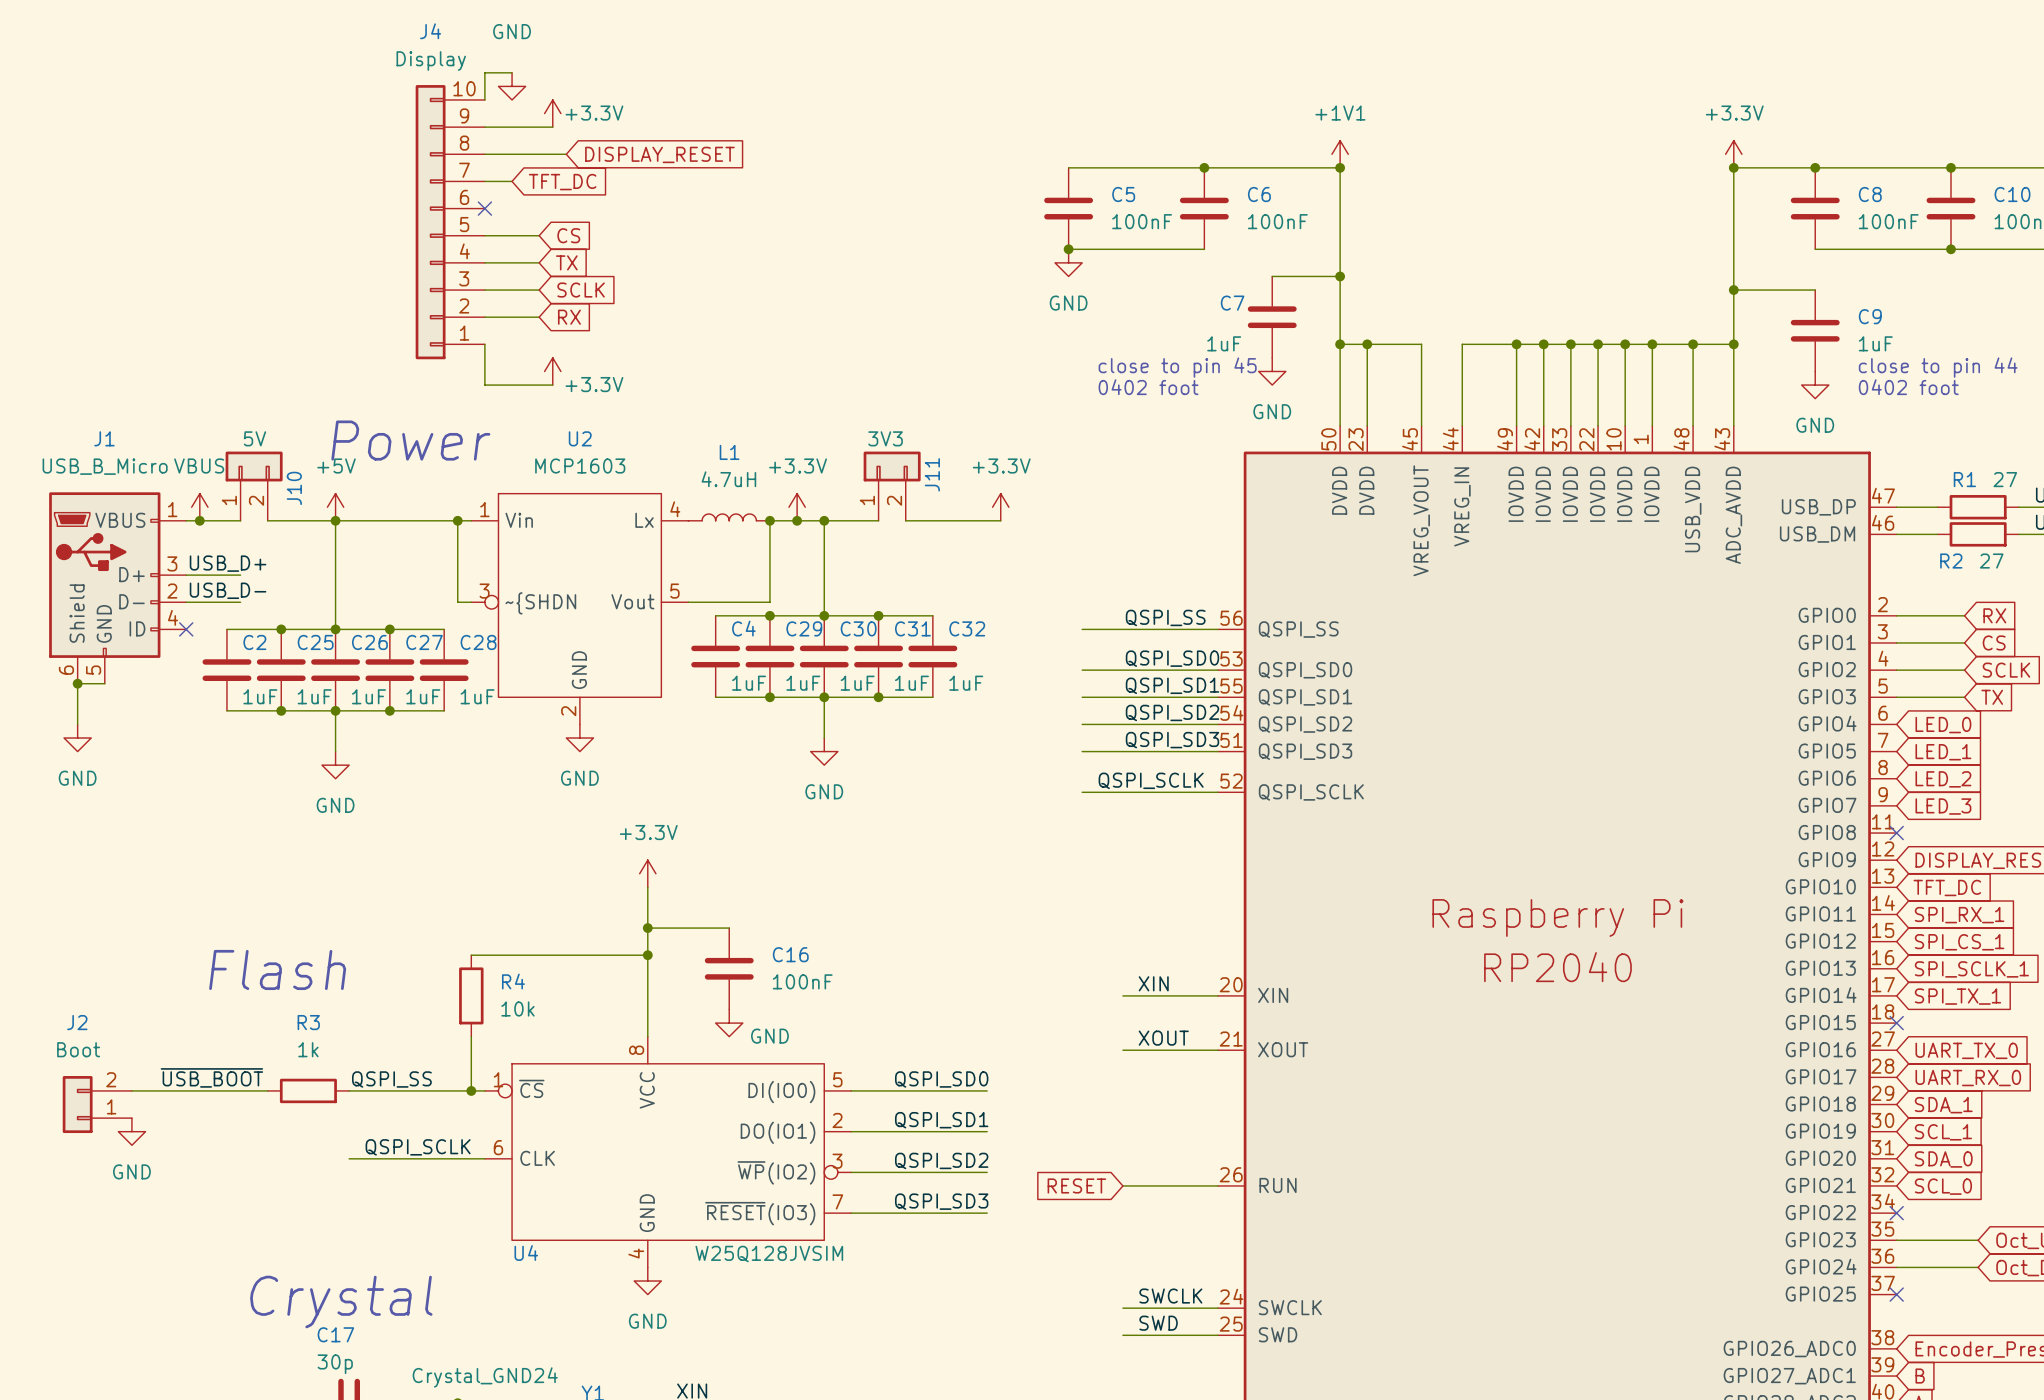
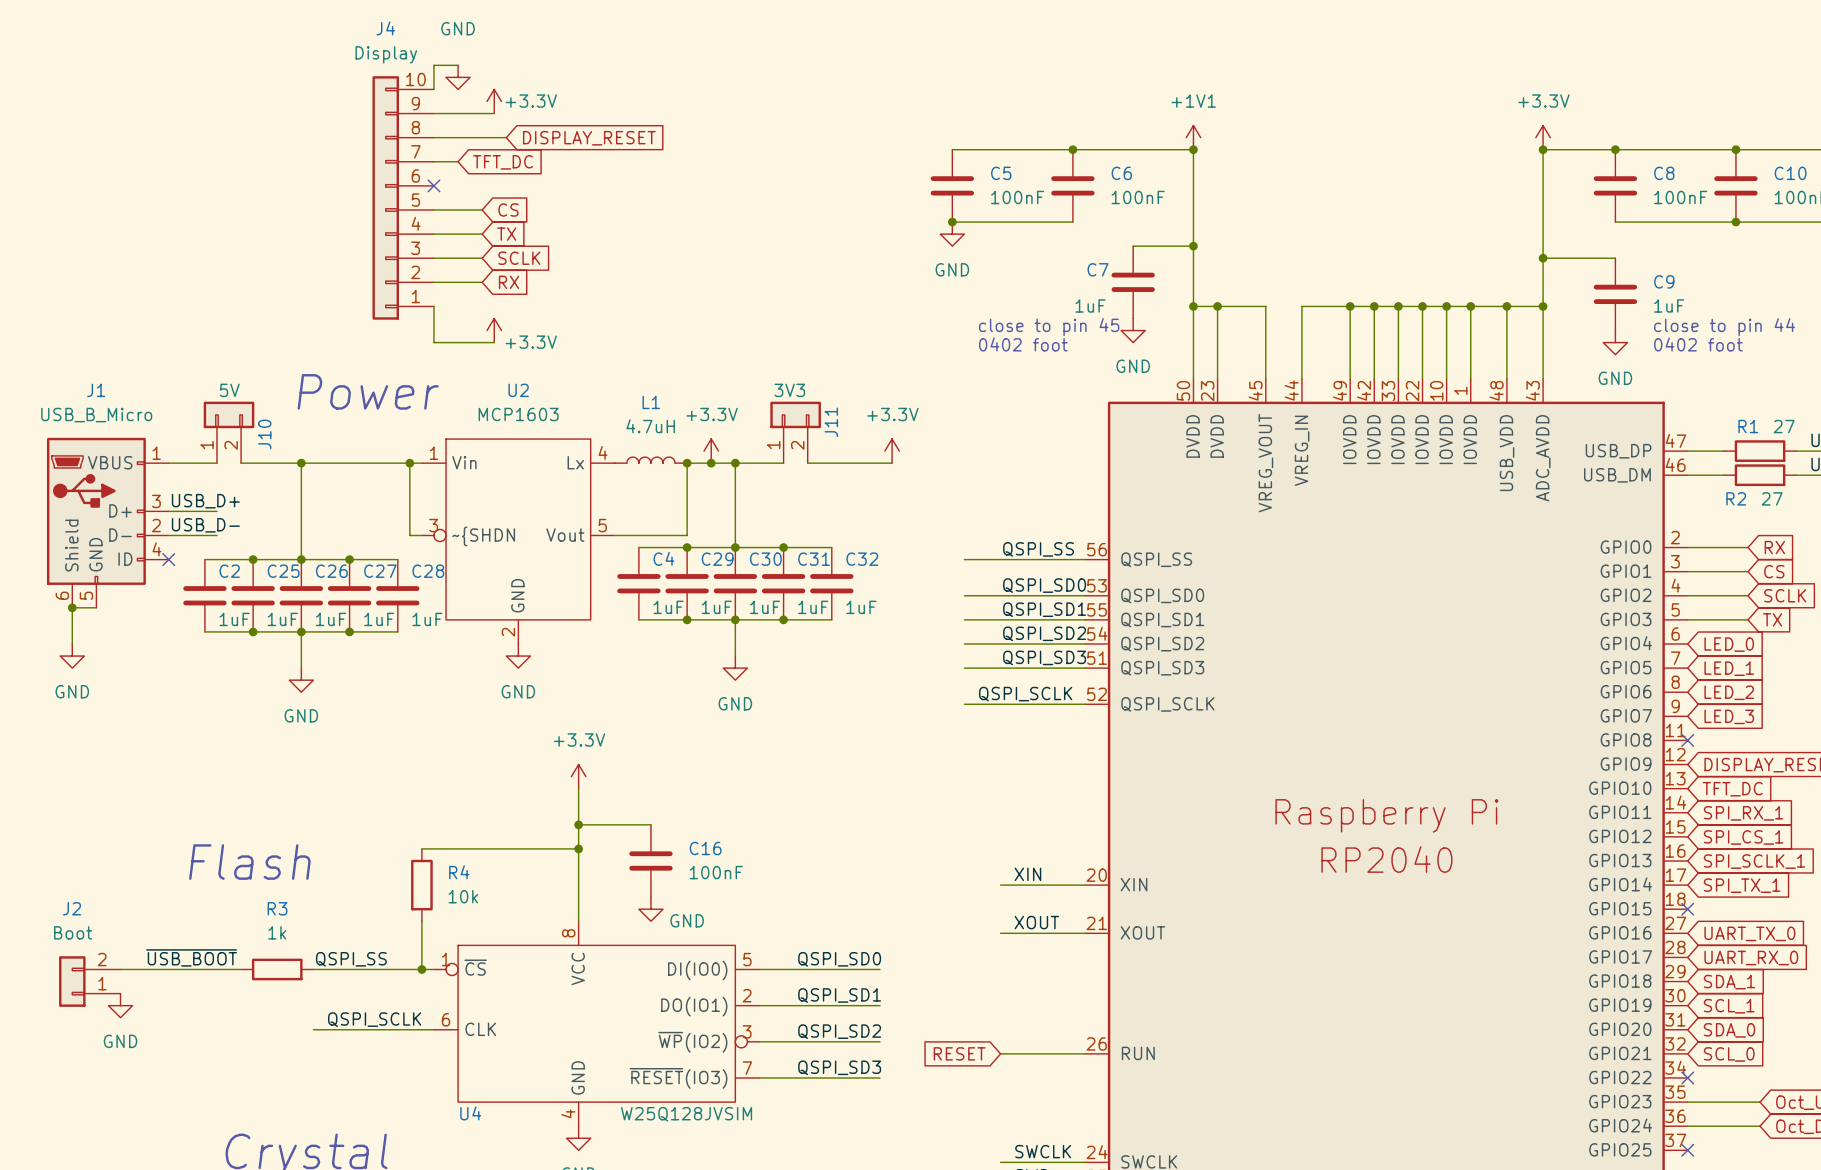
power symbol: VBUS (199, 507) -> none
power symbol: +5V (335, 507) -> none
junction: (199, 520) -> none

